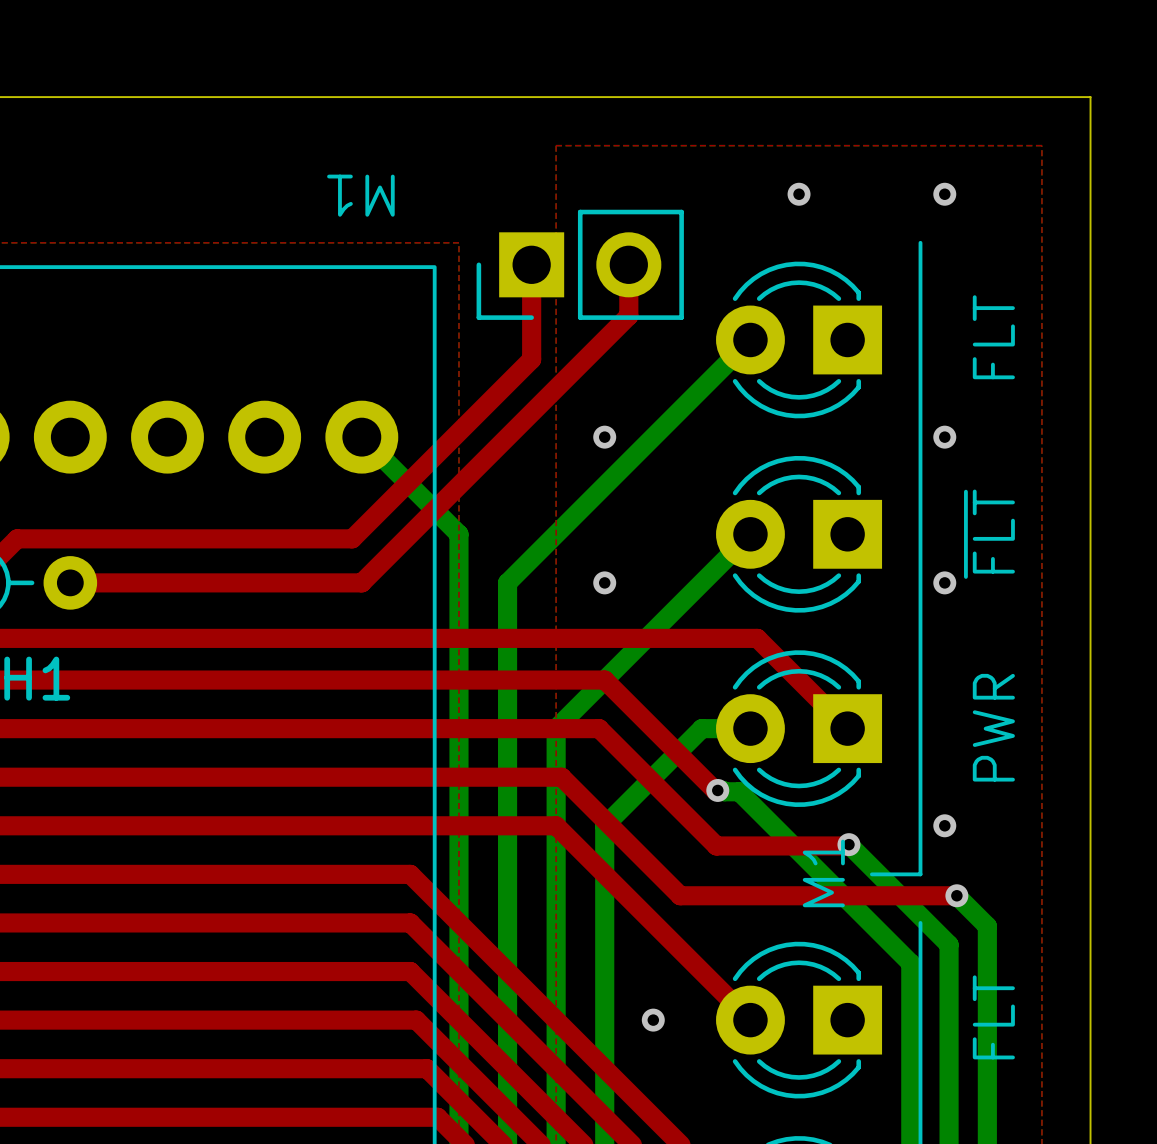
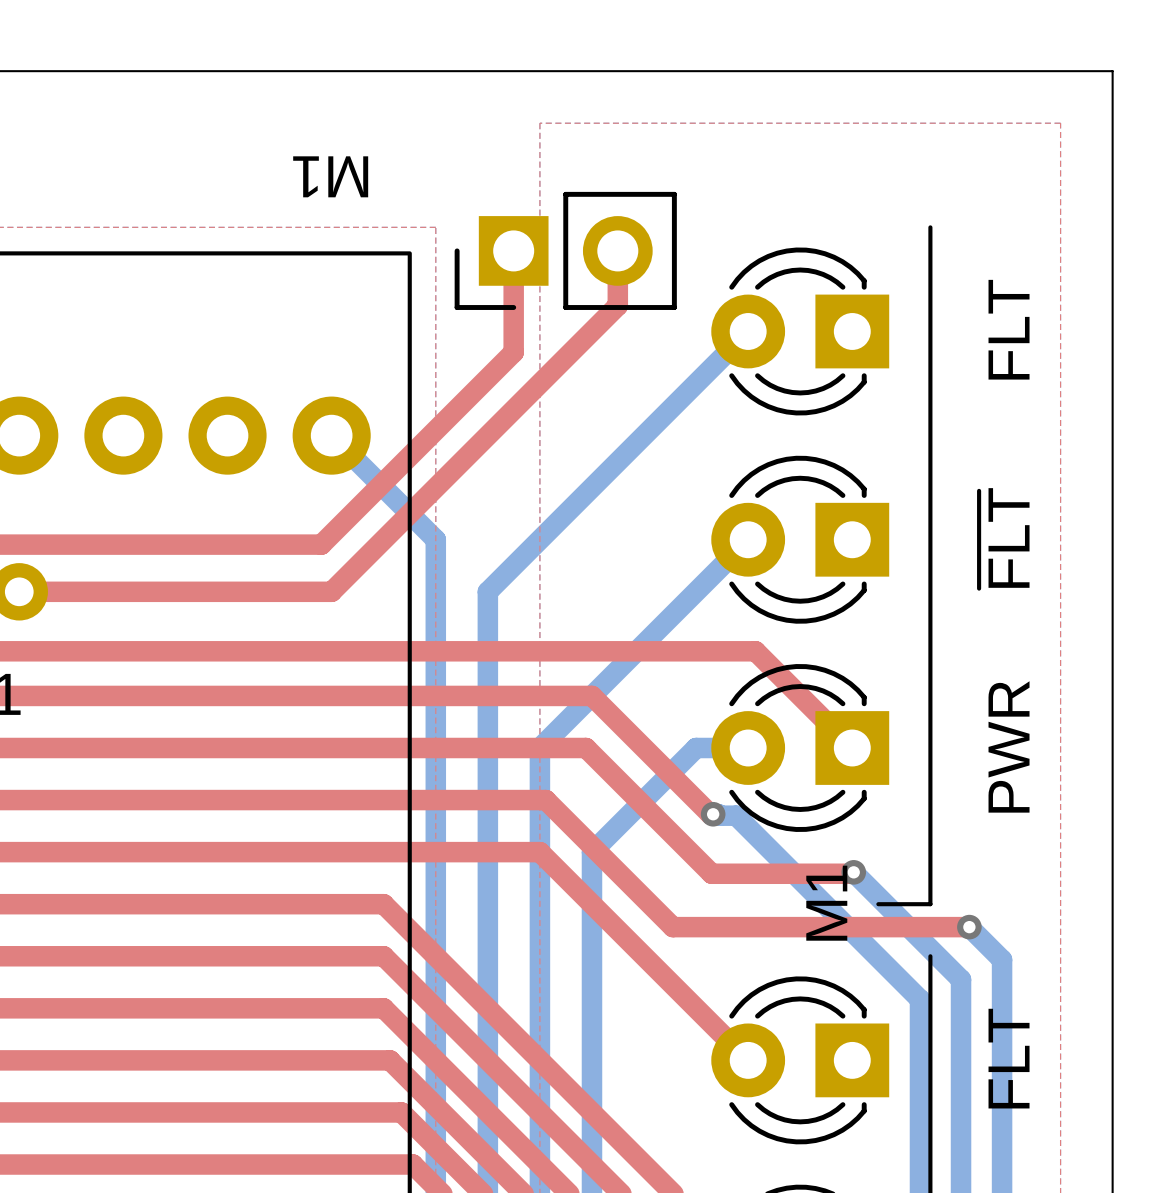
via: (799, 194) -> none
via: (944, 194) -> none
via: (604, 437) -> none
via: (944, 437) -> none
via: (604, 582) -> none
via: (944, 582) -> none
via: (944, 825) -> none
via: (653, 1020) -> none

